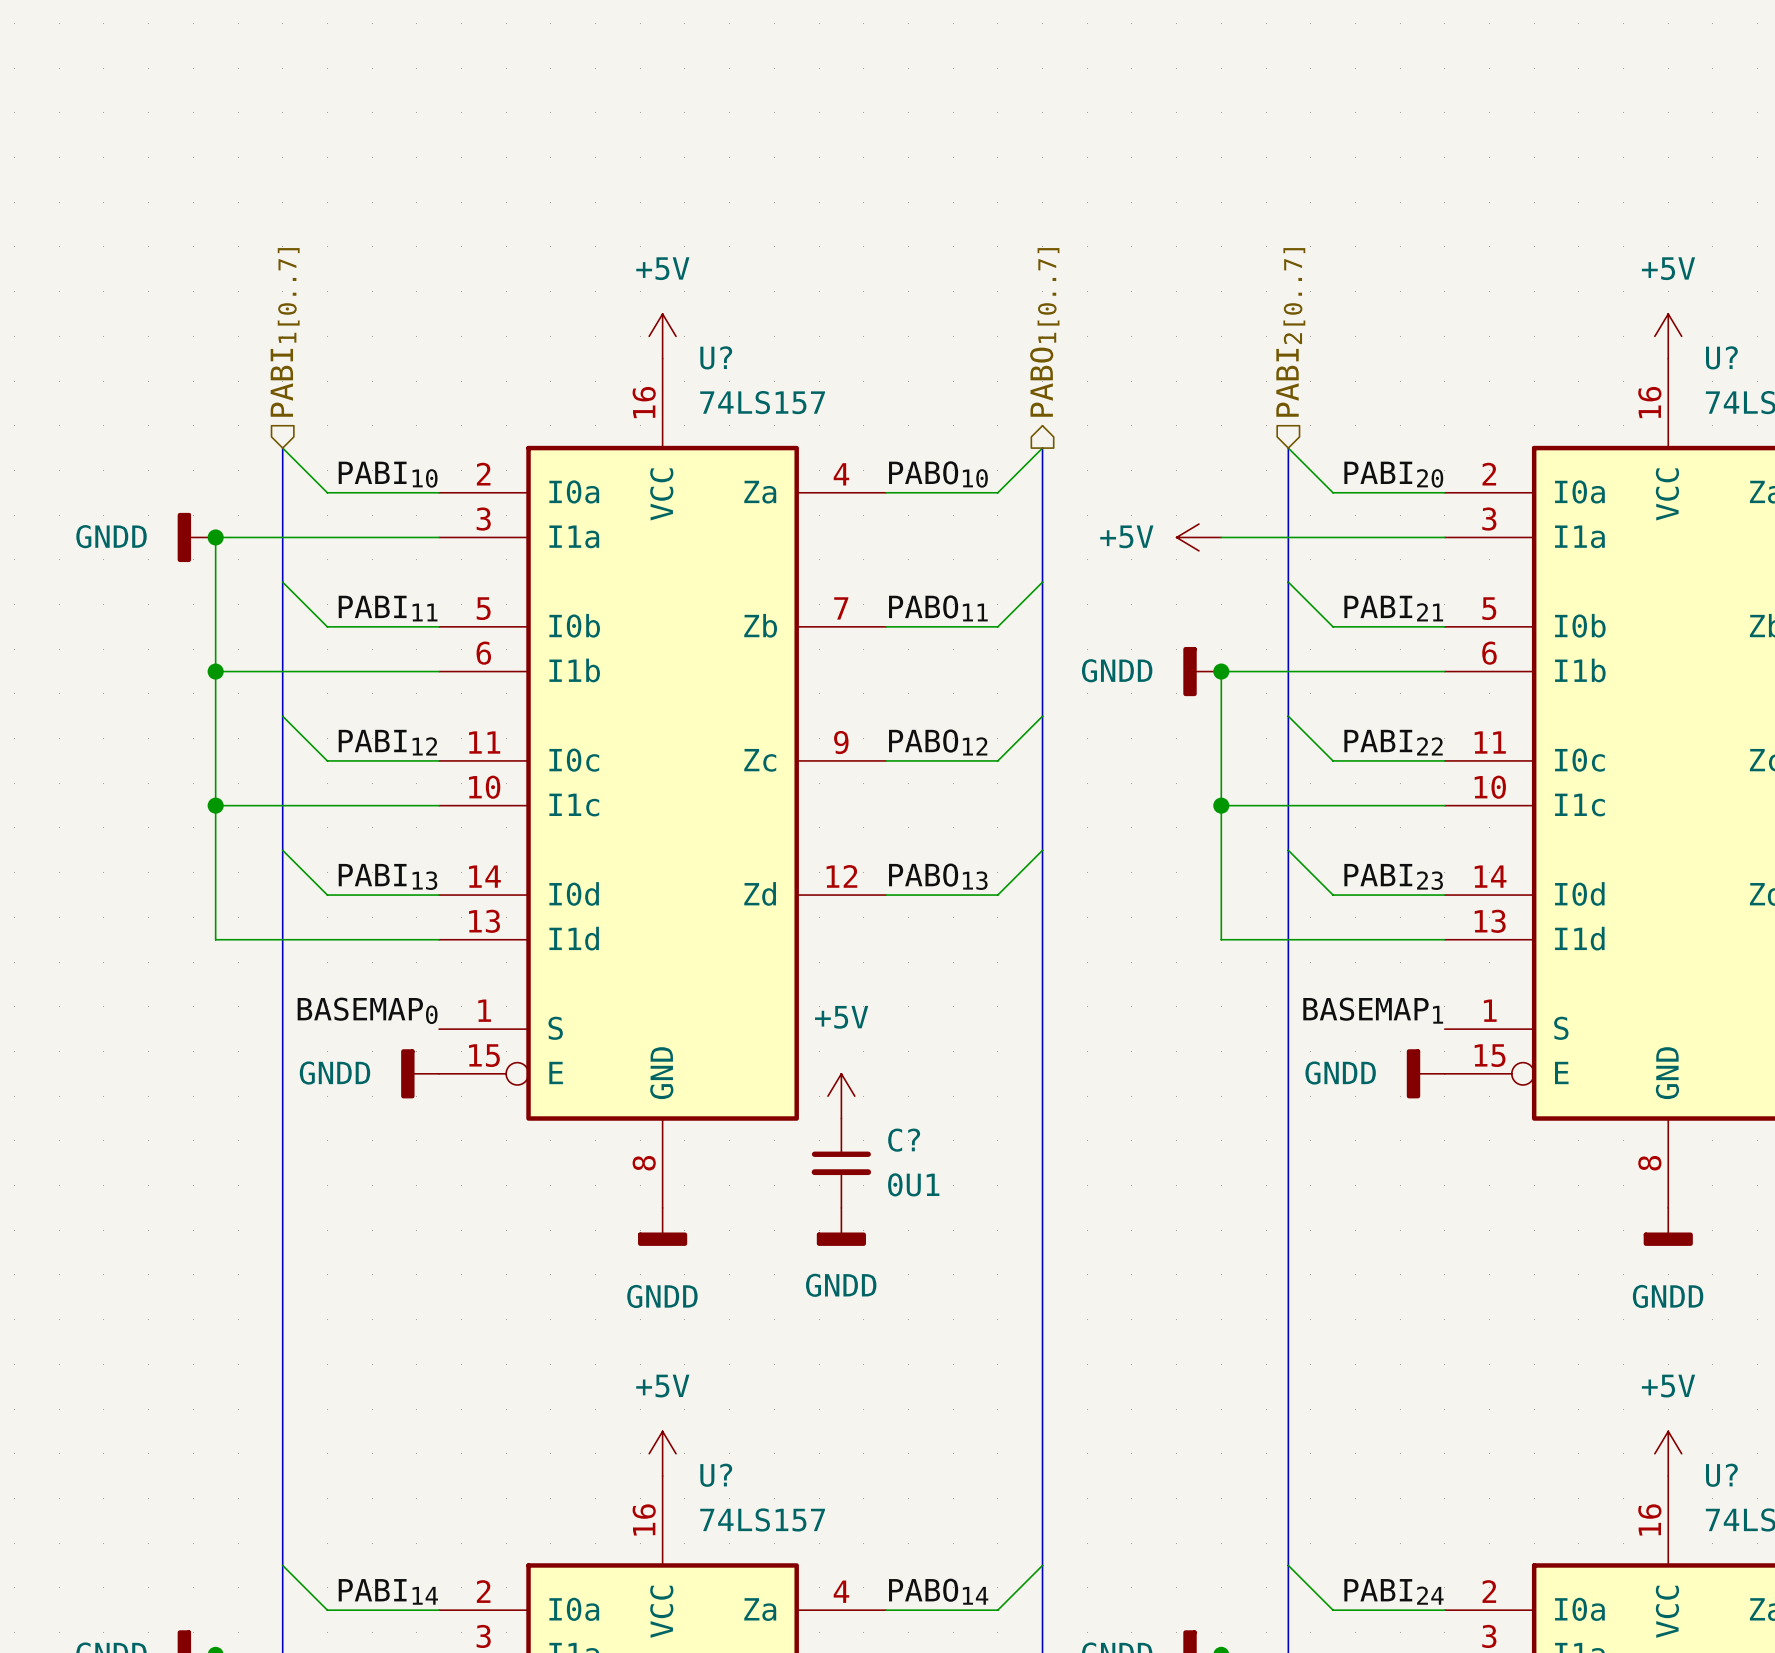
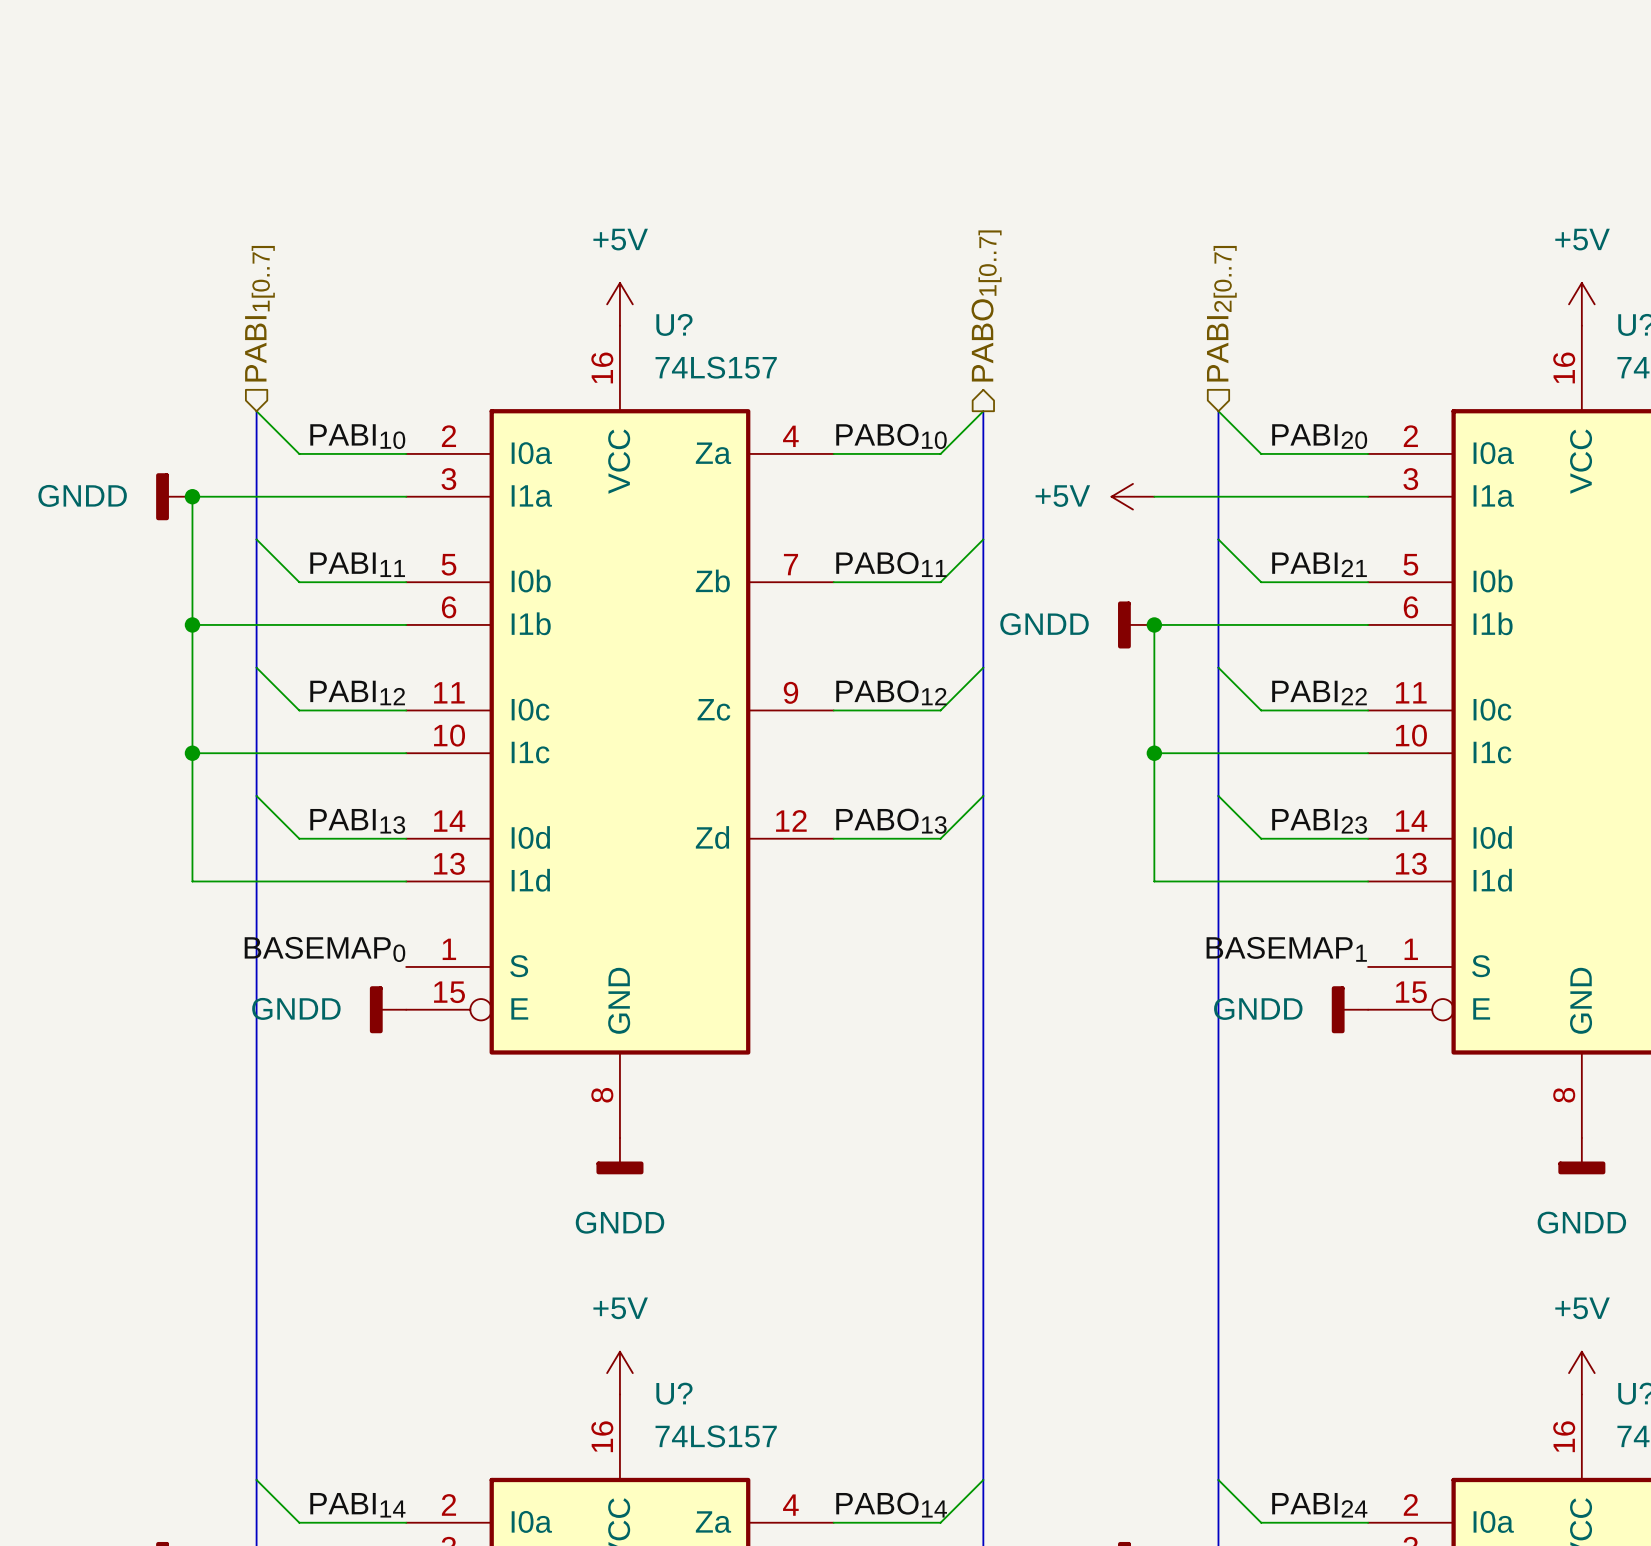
power symbol: +5V (841, 1096) -> none
C?: 0U1 (841, 1163) -> none
power symbol: GNDD (841, 1226) -> none

